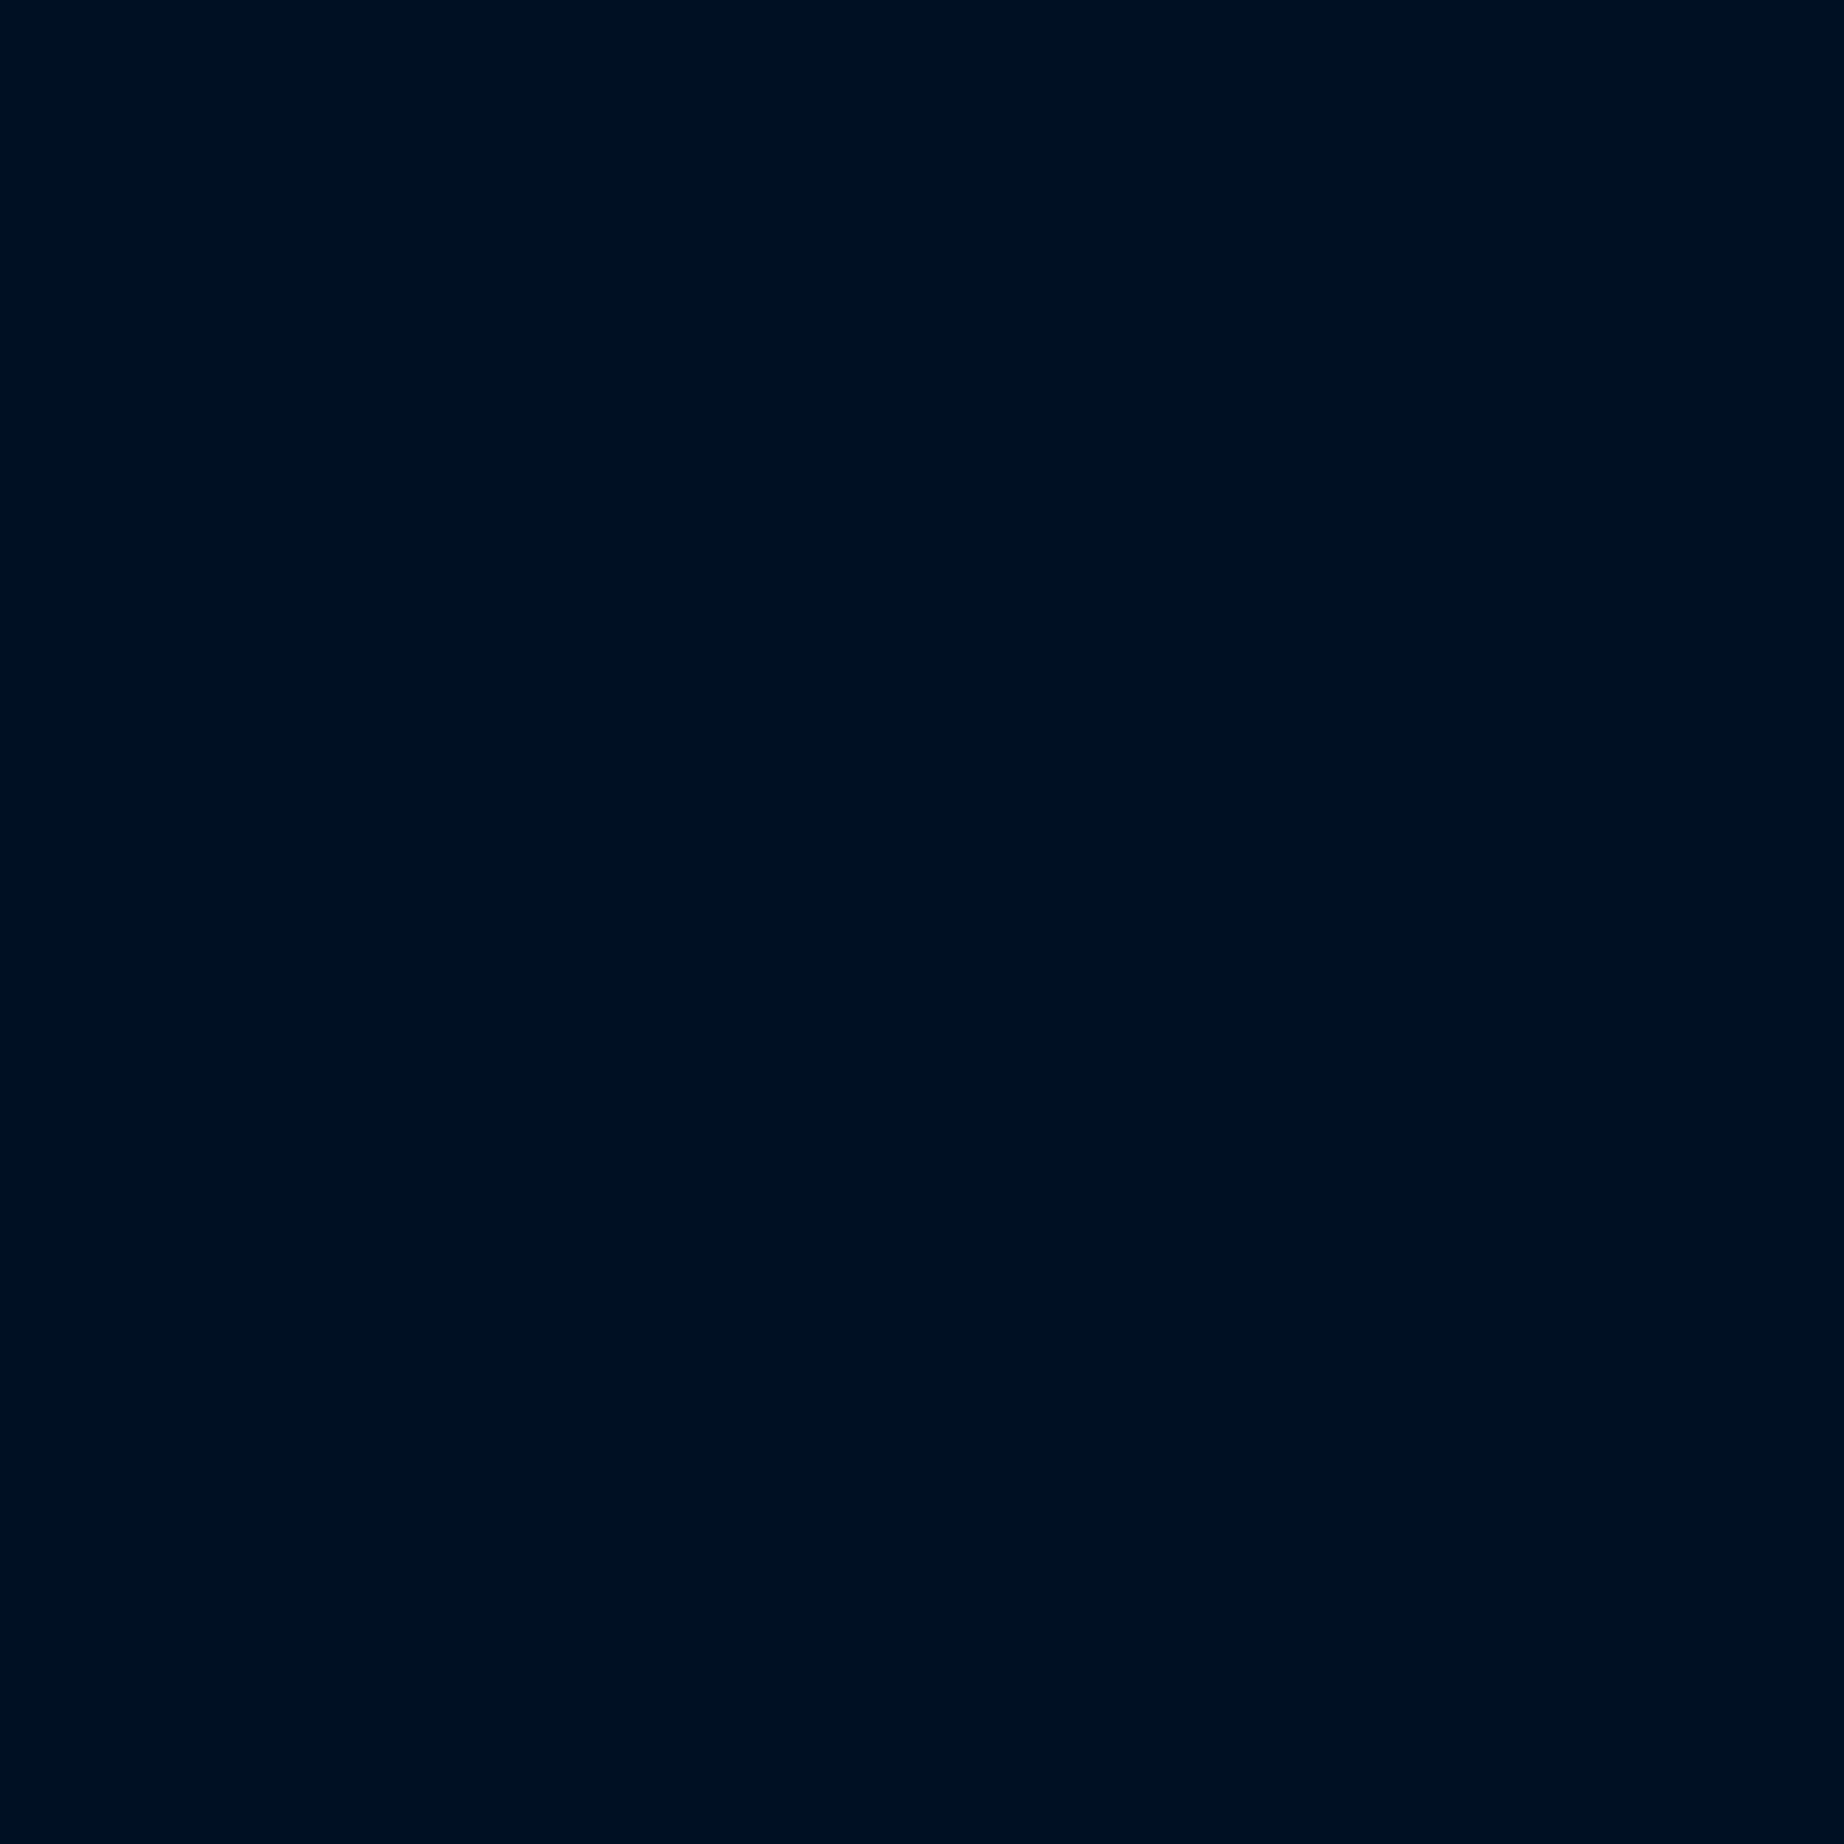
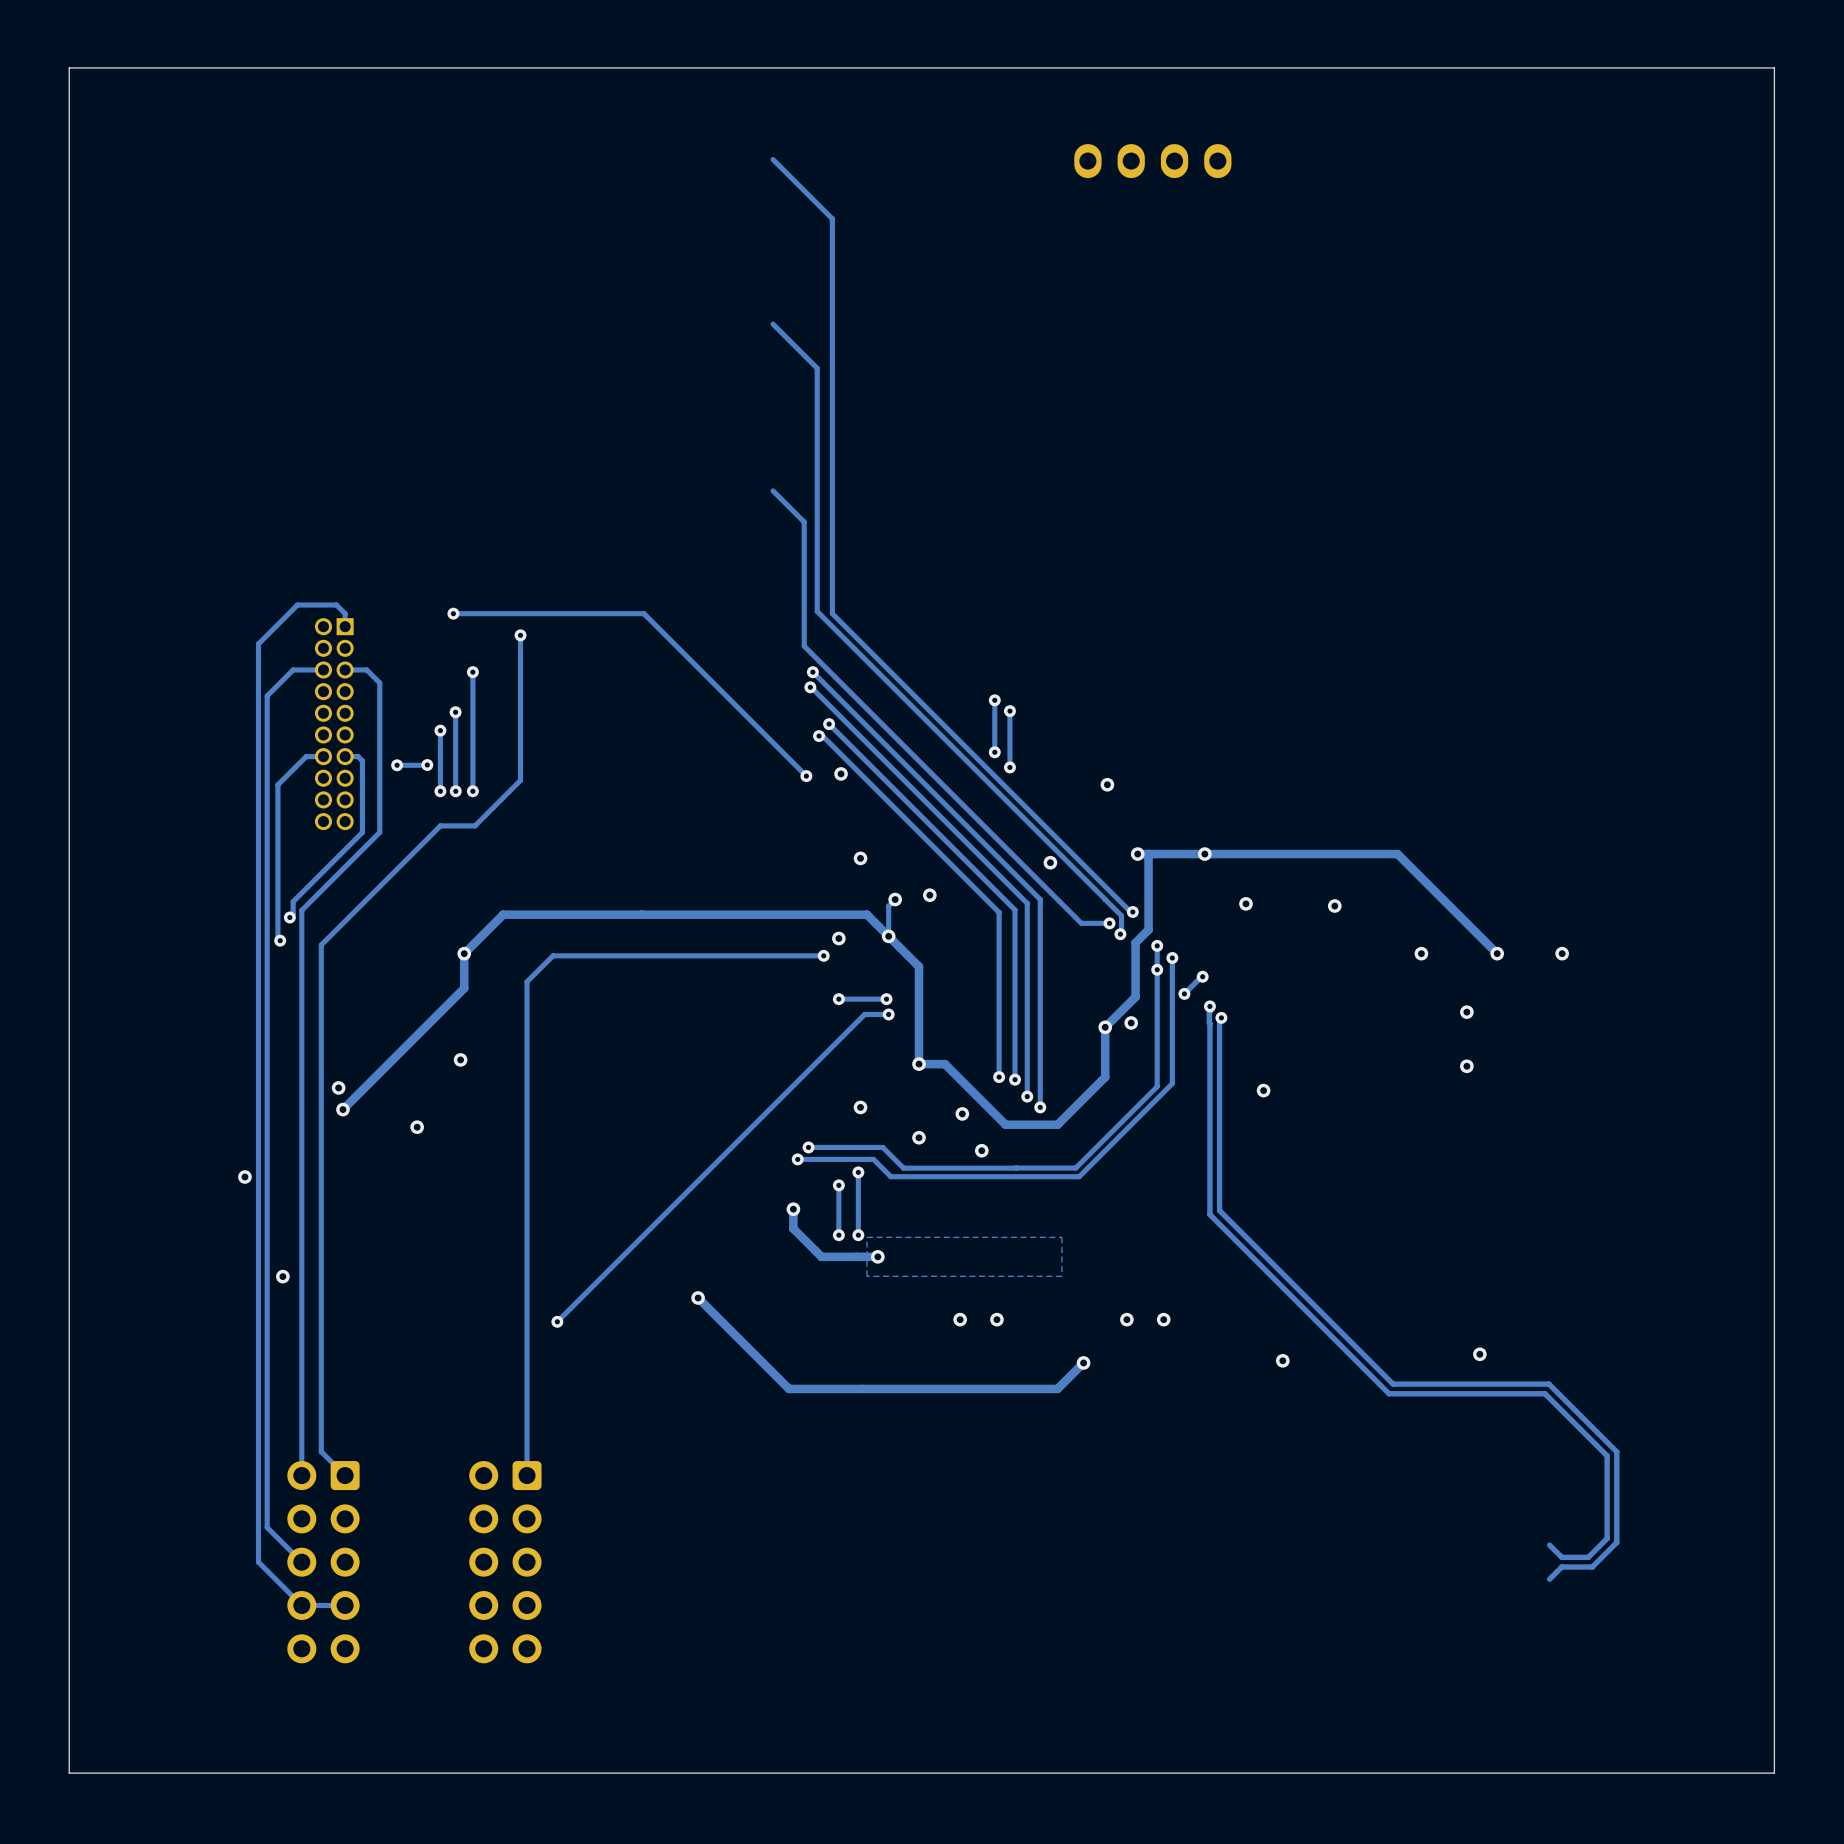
board edge: none -> (1774, 67) (69, 67) (69, 1773) (1774, 1773) (1774, 67)
track: none -> (773, 159) (832, 218) (832, 613) (1130, 911) (1132, 911)
part: none -> (1152, 161)
track: none -> (773, 324) (817, 368) (817, 611) (1121, 915) (1120, 934)
track: none -> (773, 490) (804, 522) (804, 646) (1081, 923) (1109, 923)
track: none -> (453, 613) (643, 613) (806, 776)
via: none -> (453, 613)
track: none -> (345, 626) (345, 613) (336, 605) (297, 605) (258, 644) (258, 1562) (301, 1605) (345, 1605)
track: none -> (520, 635) (520, 780) (475, 825) (440, 825) (321, 945) (321, 1451) (345, 1475)
via: none -> (520, 635)
track: none -> (323, 669) (293, 669) (267, 695) (267, 1527) (301, 1562)
track: none -> (345, 669) (366, 669) (379, 682) (379, 832) (301, 910) (301, 1475)
track: none -> (472, 672) (472, 791)
via: none -> (472, 672)
track: none -> (812, 672) (1040, 899) (1040, 1107)
via: none -> (812, 672)
track: none -> (810, 687) (1027, 903) (1027, 1096)
via: none -> (810, 687)
track: none -> (994, 700) (994, 752)
via: none -> (994, 700)
track: none -> (1009, 711) (1009, 767)
via: none -> (1009, 711)
via: none -> (455, 712)
track: none -> (455, 717) (455, 791)
part: none -> (334, 724)
track: none -> (829, 724) (1015, 910) (1015, 1079)
via: none -> (829, 724)
track: none -> (440, 730) (440, 791)
via: none -> (440, 730)
track: none -> (819, 736) (822, 736) (999, 912) (999, 1077)
via: none -> (819, 736)
via: none -> (994, 752)
track: none -> (323, 756) (306, 756) (277, 784) (277, 938) (280, 940)
track: none -> (345, 756) (358, 756) (362, 760) (362, 832) (293, 901) (293, 914) (289, 917)
via: none -> (397, 765)
track: none -> (427, 765) (397, 765)
via: none -> (427, 765)
via: none -> (1009, 767)
via: none -> (841, 773)
via: none -> (806, 776)
via: none -> (1107, 784)
via: none -> (440, 791)
via: none -> (455, 791)
via: none -> (472, 791)
track: none -> (1137, 854) (1397, 854) (1497, 953)
via: none -> (1137, 854)
track: none -> (1148, 854) (1148, 929) (1135, 942) (1135, 996) (1105, 1027) (1105, 1077) (1057, 1124) (1005, 1124) (944, 1064) (919, 1064) (919, 966) (867, 914) (503, 914) (464, 953) (464, 988) (342, 1109)
via: none -> (1204, 854)
via: none -> (860, 858)
via: none -> (1050, 862)
via: none -> (929, 895)
track: none -> (895, 899) (888, 906) (888, 936)
via: none -> (895, 899)
via: none -> (1245, 903)
via: none -> (1334, 906)
via: none -> (1132, 911)
via: none -> (289, 917)
via: none -> (1109, 923)
via: none -> (1120, 934)
via: none -> (888, 936)
via: none -> (838, 938)
via: none -> (280, 940)
track: none -> (1157, 945) (1157, 1086) (1075, 1168) (1016, 1168)
via: none -> (1157, 945)
via: none -> (464, 953)
via: none -> (1421, 953)
via: none -> (1497, 953)
via: none -> (1562, 953)
track: none -> (823, 955) (553, 955) (527, 981) (527, 1475)
via: none -> (823, 955)
track: none -> (1172, 958) (1172, 1083) (1079, 1176) (890, 1176) (873, 1159) (797, 1159)
via: none -> (1172, 958)
via: none -> (1157, 969)
track: none -> (1202, 976) (1184, 993)
via: none -> (1202, 976)
via: none -> (1184, 993)
via: none -> (838, 999)
track: none -> (886, 999) (838, 999)
via: none -> (886, 999)
track: none -> (1209, 1006) (1209, 1214) (1389, 1393) (1545, 1393) (1607, 1455) (1607, 1538) (1588, 1557) (1561, 1557) (1549, 1545)
via: none -> (1209, 1006)
via: none -> (1466, 1012)
track: none -> (888, 1014) (864, 1014) (557, 1321)
via: none -> (888, 1014)
track: none -> (1221, 1017) (1219, 1019) (1219, 1210) (1393, 1384) (1549, 1384) (1616, 1451) (1616, 1542) (1592, 1567) (1561, 1567) (1549, 1579)
via: none -> (1221, 1017)
via: none -> (1131, 1022)
via: none -> (1105, 1027)
via: none -> (460, 1059)
via: none -> (919, 1064)
via: none -> (1466, 1066)
via: none -> (999, 1077)
via: none -> (1015, 1079)
via: none -> (338, 1087)
via: none -> (1263, 1090)
via: none -> (1027, 1096)
via: none -> (860, 1107)
via: none -> (1040, 1107)
via: none -> (342, 1109)
via: none -> (962, 1113)
via: none -> (417, 1127)
via: none -> (919, 1137)
track: none -> (808, 1147) (882, 1147) (903, 1168) (1016, 1168)
via: none -> (808, 1147)
via: none -> (981, 1150)
via: none -> (797, 1159)
track: none -> (858, 1172) (858, 1235)
via: none -> (858, 1172)
via: none -> (244, 1176)
track: none -> (838, 1185) (838, 1235)
via: none -> (838, 1185)
track: none -> (793, 1209) (793, 1228) (821, 1256) (877, 1256)
via: none -> (793, 1209)
via: none -> (838, 1235)
via: none -> (858, 1235)
zone outline: none -> (1061, 1237) (1061, 1276) (867, 1276) (867, 1237) (1061, 1237)
via: none -> (877, 1256)
via: none -> (282, 1276)
track: none -> (698, 1297) (789, 1388) (1057, 1388) (1083, 1362)
via: none -> (698, 1297)
via: none -> (960, 1319)
via: none -> (996, 1319)
via: none -> (1126, 1319)
via: none -> (1163, 1319)
via: none -> (557, 1321)
via: none -> (1479, 1354)
via: none -> (1282, 1360)
via: none -> (1083, 1362)
part: none -> (323, 1562)
part: none -> (505, 1562)

